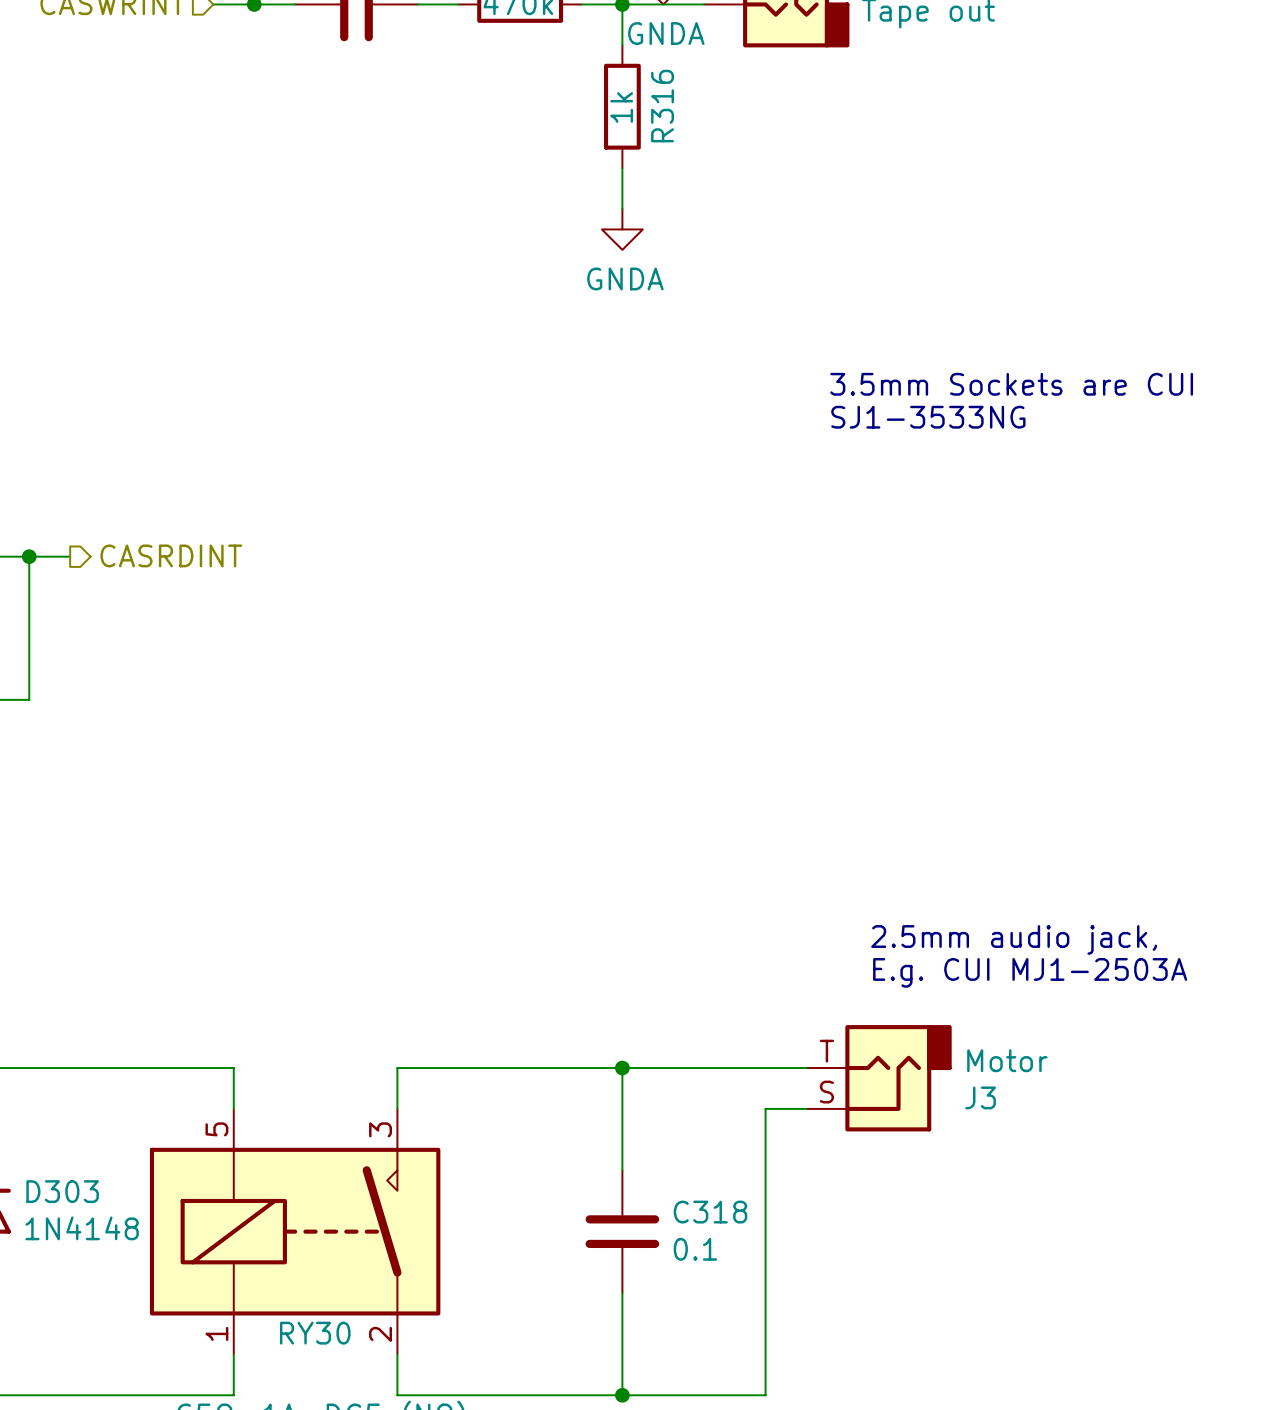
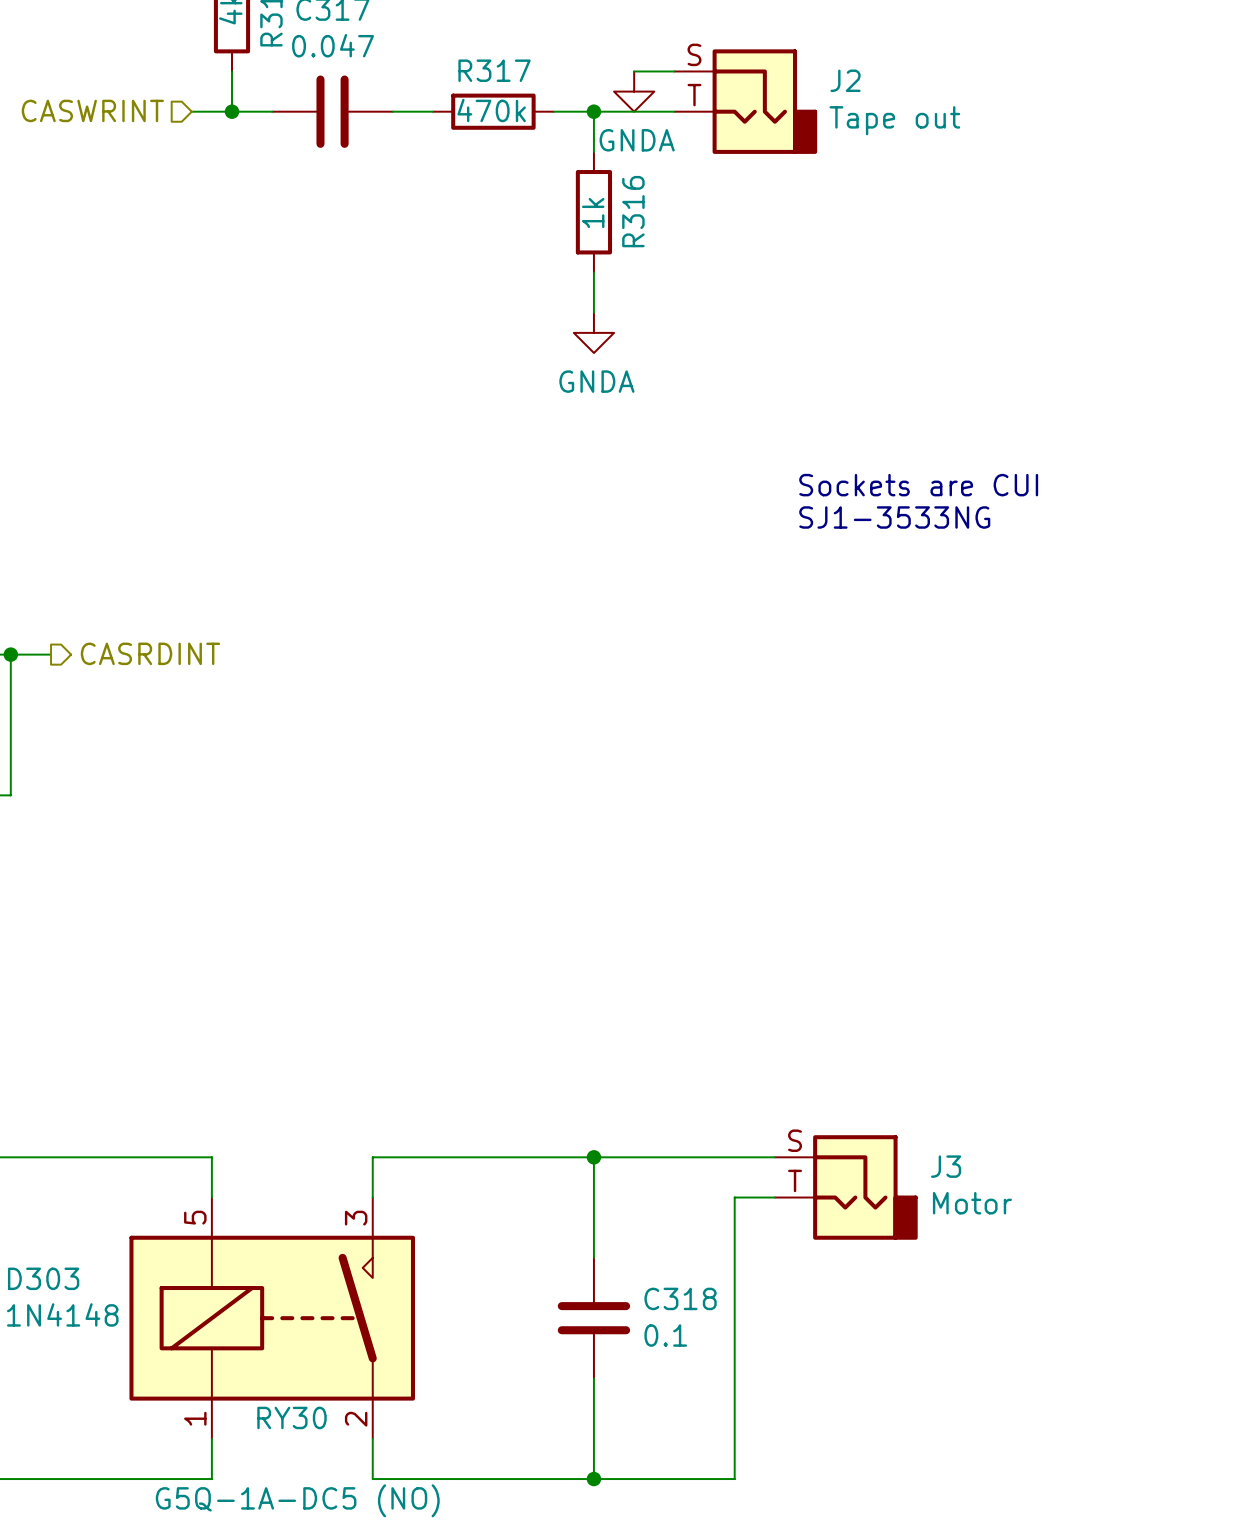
text: 3.5mm Sockets are CUI (1011, 384) -> Sockets are CUI (918, 485)
text: 2.5mm audio jack, (1014, 939) -> none
text: E.g. CUI MJ1-2503A (1030, 972) -> none
J3 flip: as is (898, 1078) -> up-down (865, 1187)

